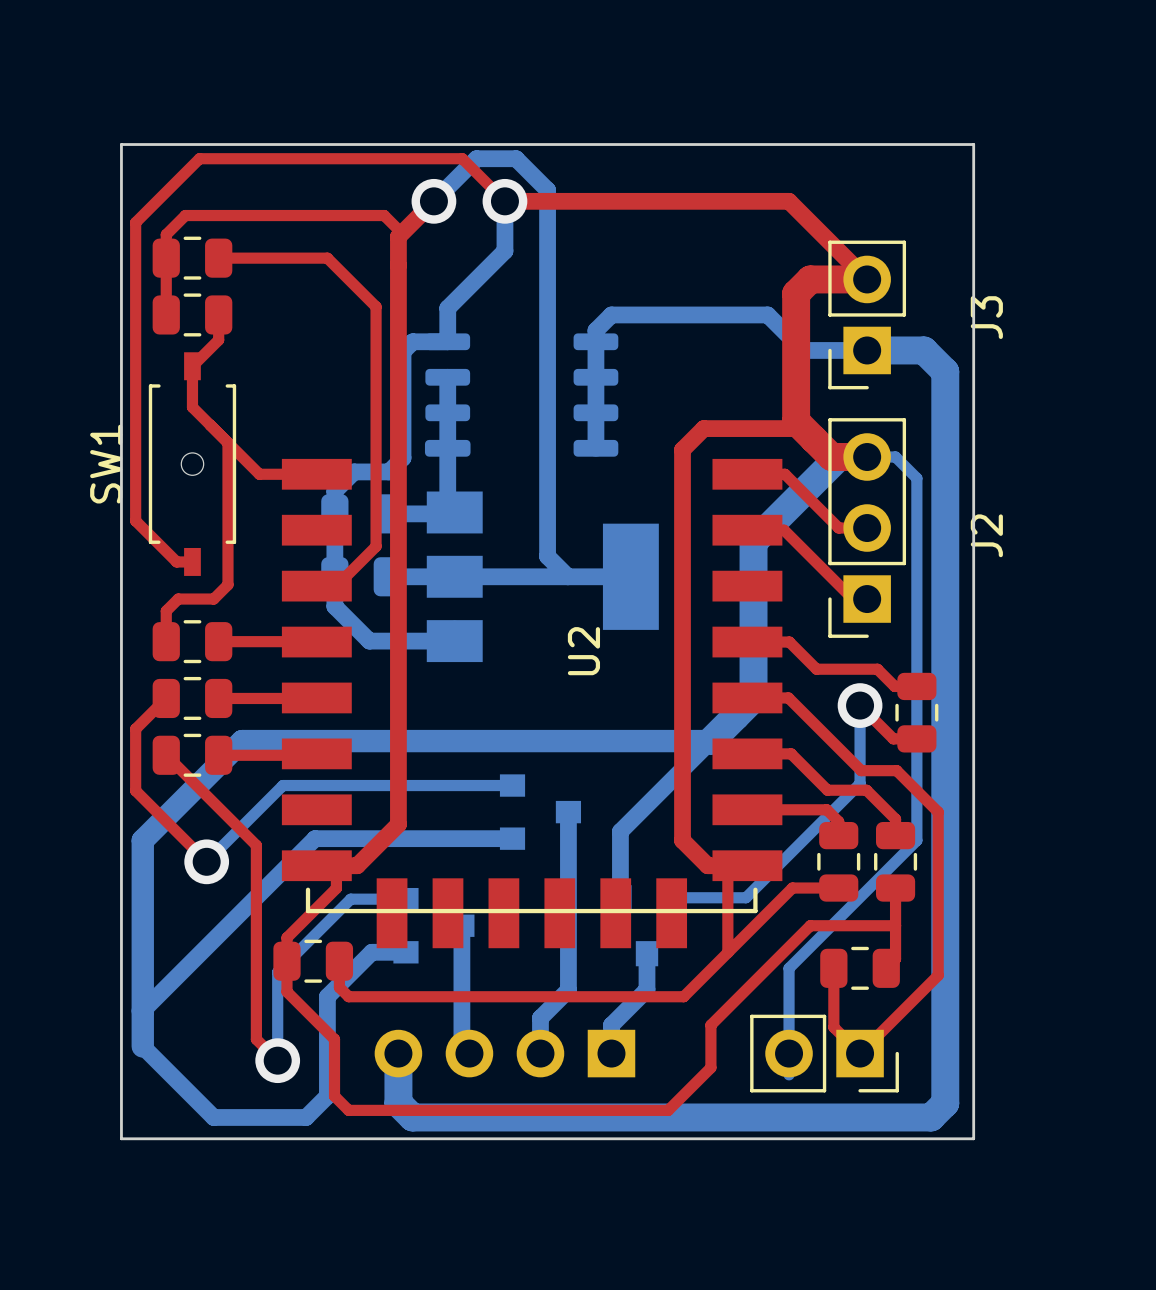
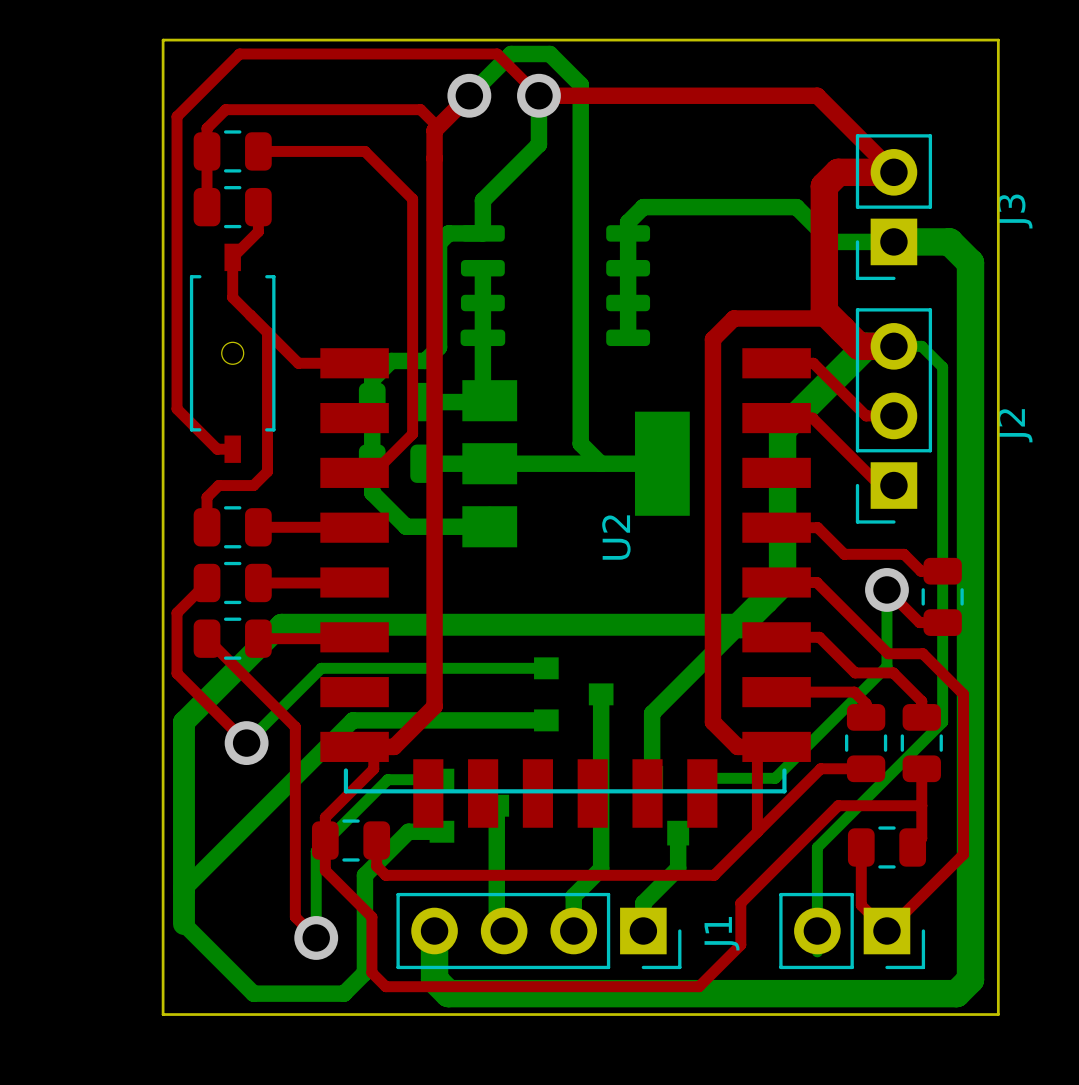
SW1 name: SW1 (106, 464) -> none
J1 side: bottom (504, 1053) -> top (538, 931)

